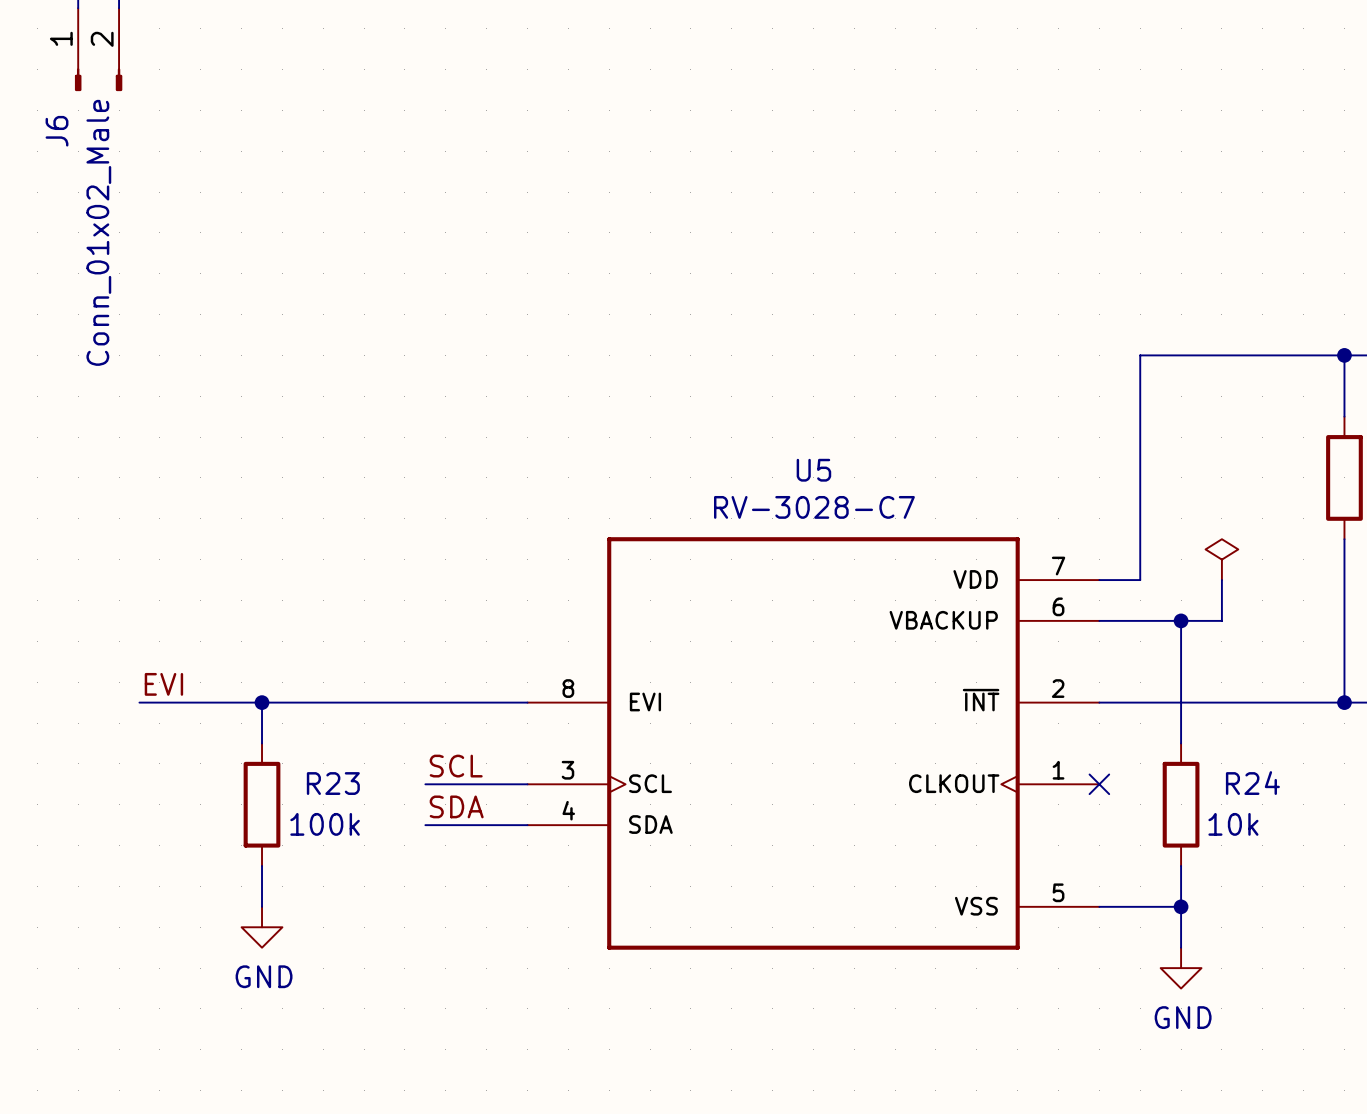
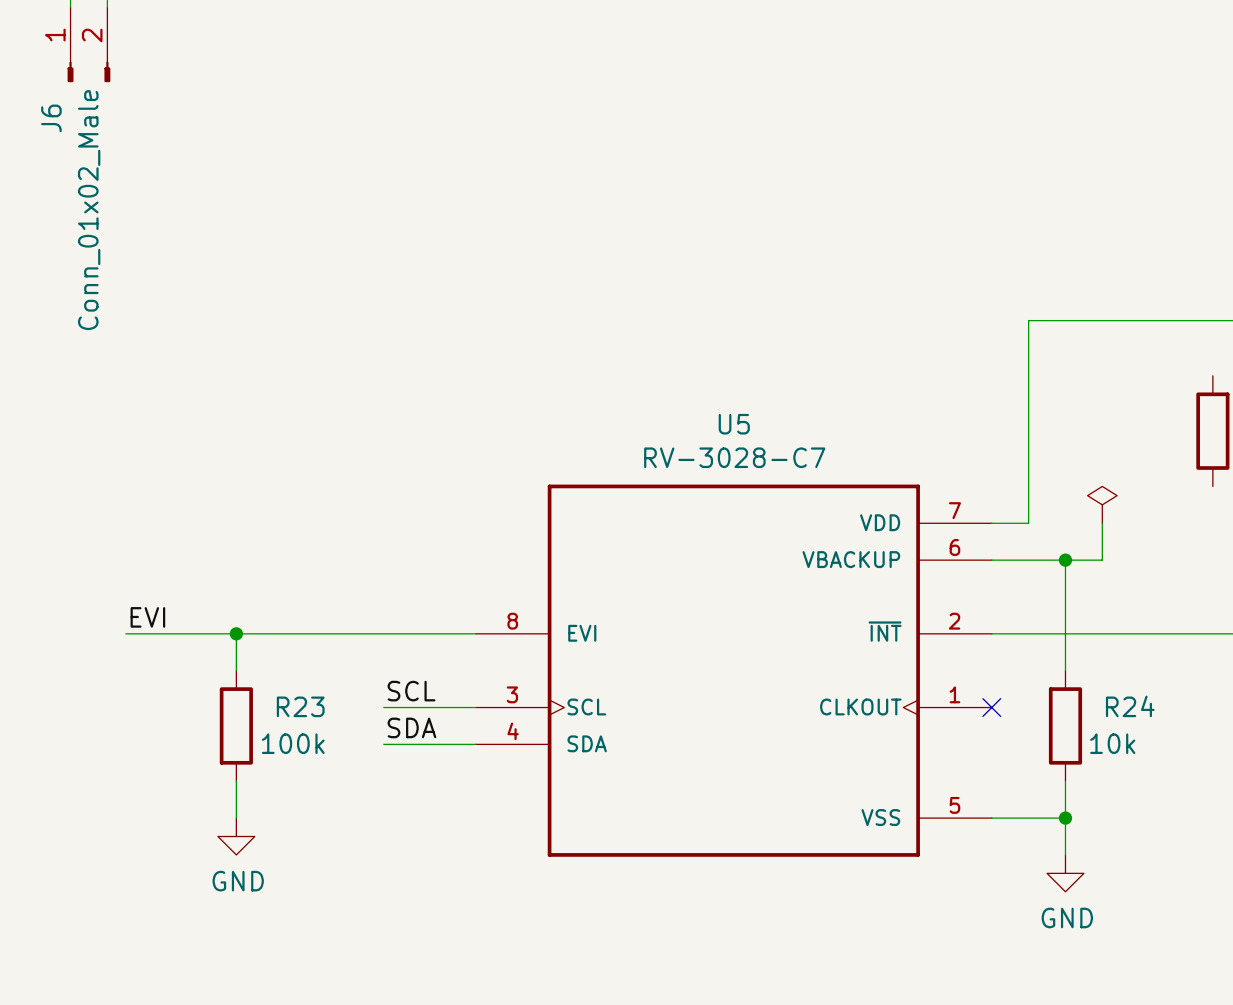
wire: (1344, 355) (1344, 416) -> none
junction: (1344, 355) -> none
wire: (1344, 539) (1344, 702) -> none
junction: (1344, 702) -> none

